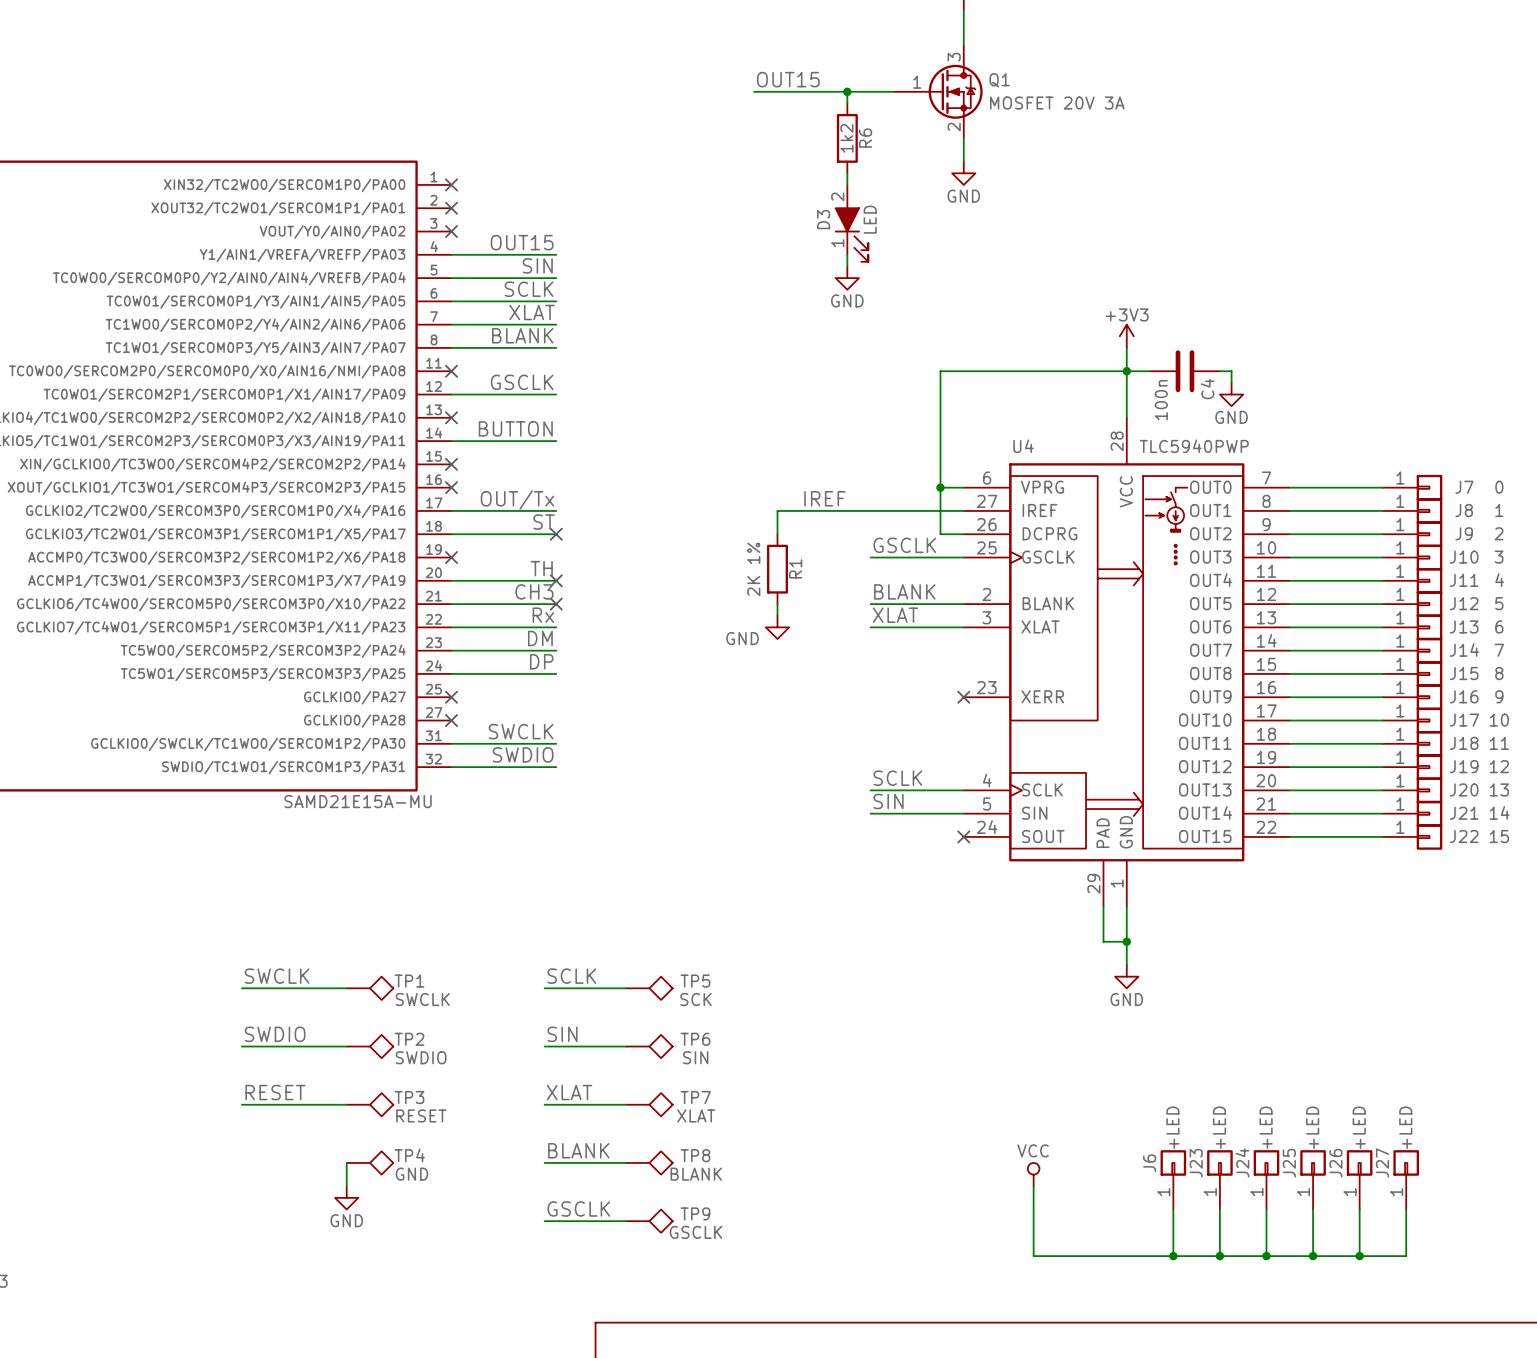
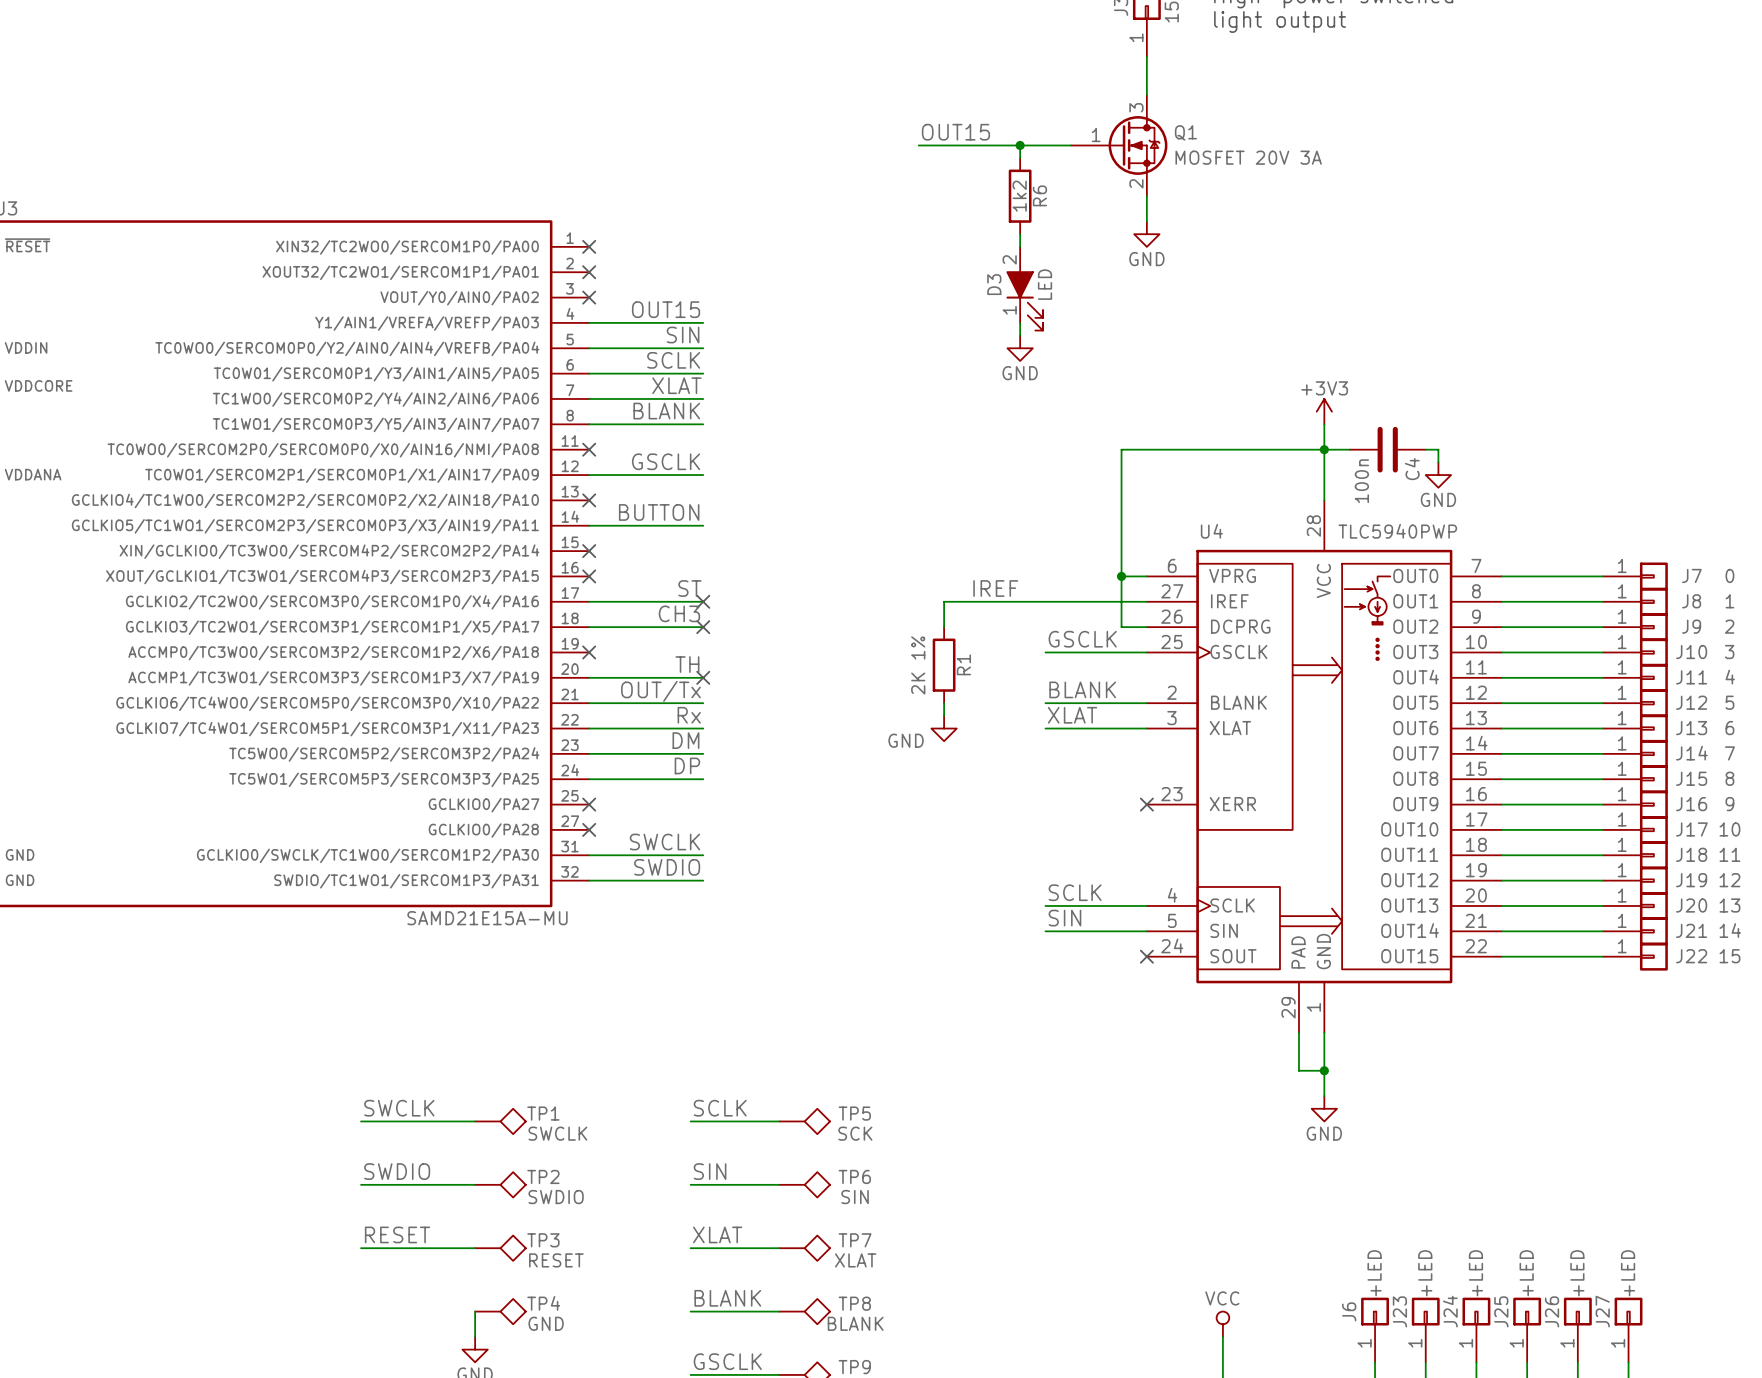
label: OUT/Tx (517, 500) -> ST (689, 588)
no-connect mark: none -> (703, 601)
label: ST (544, 522) -> CH3 (679, 613)
label: CH3 (534, 591) -> OUT/Tx (660, 691)
no-connect mark: (556, 604) -> none

